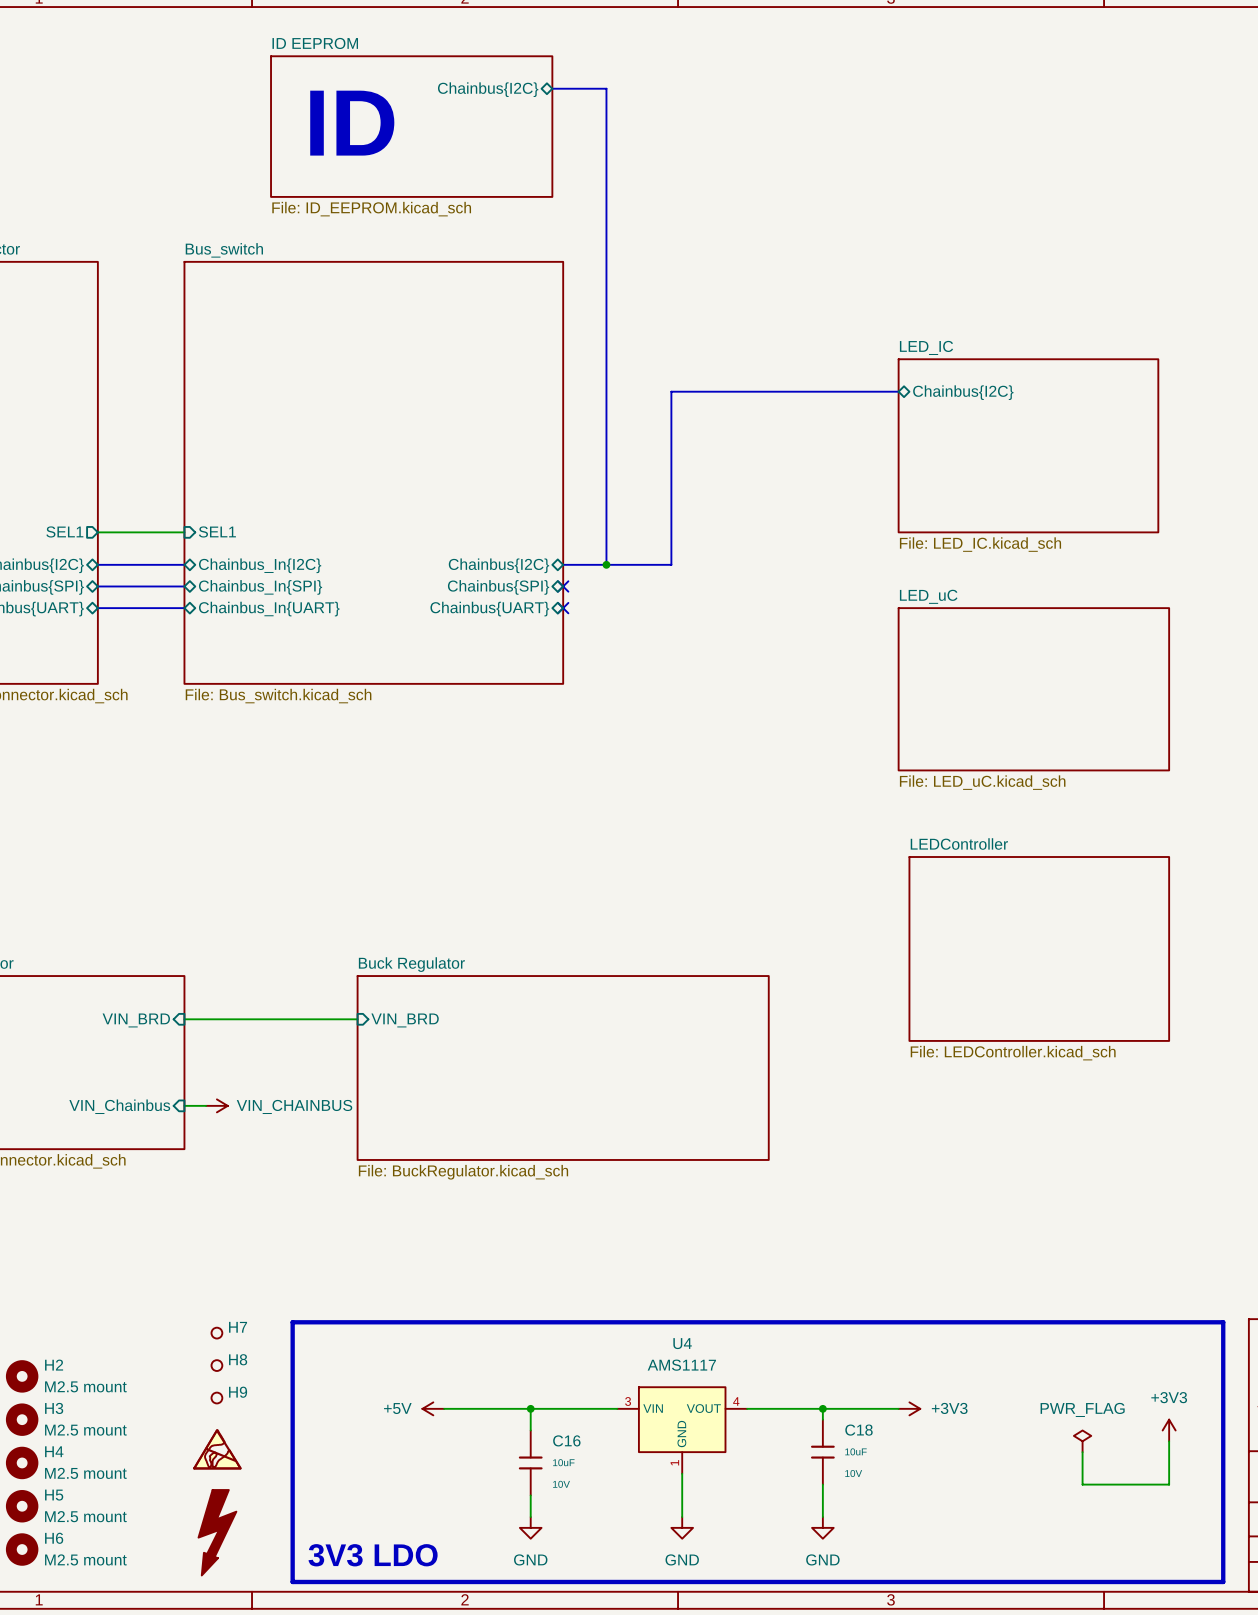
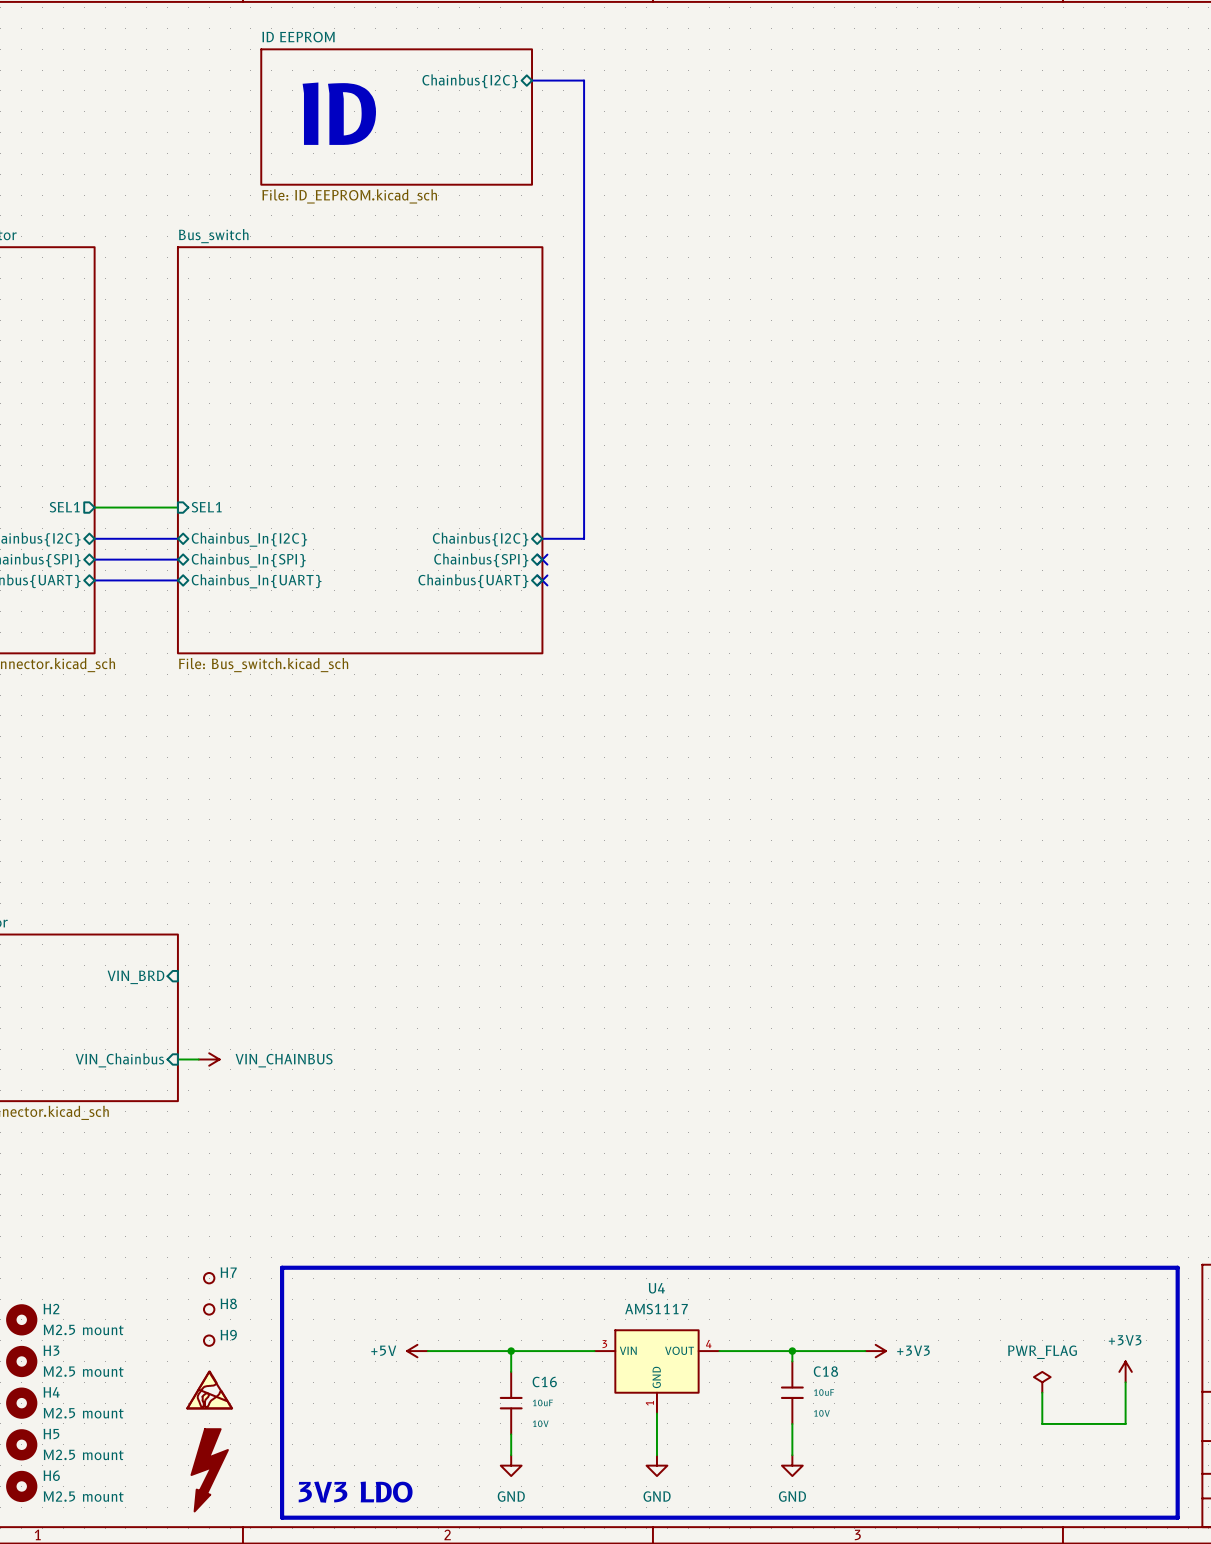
bus: (898, 391) (671, 391) (671, 564) (606, 564) -> none
sheet pin: Chainbus{I2C} (963, 392) -> none
sheet LED_IC: File: LED_IC.kicad_sch (1028, 445) -> none
junction: (606, 564) -> none
sheet LED_uC: File: LED_uC.kicad_sch (1033, 689) -> none
sheet LEDController: File: LEDController.kicad_sch (1039, 948) -> none
wire: (184, 1019) (357, 1019) -> none
sheet pin: VIN_BRD (405, 1020) -> none
sheet Buck Regulator: File: BuckRegulator.kicad_sch (563, 1068) -> none

